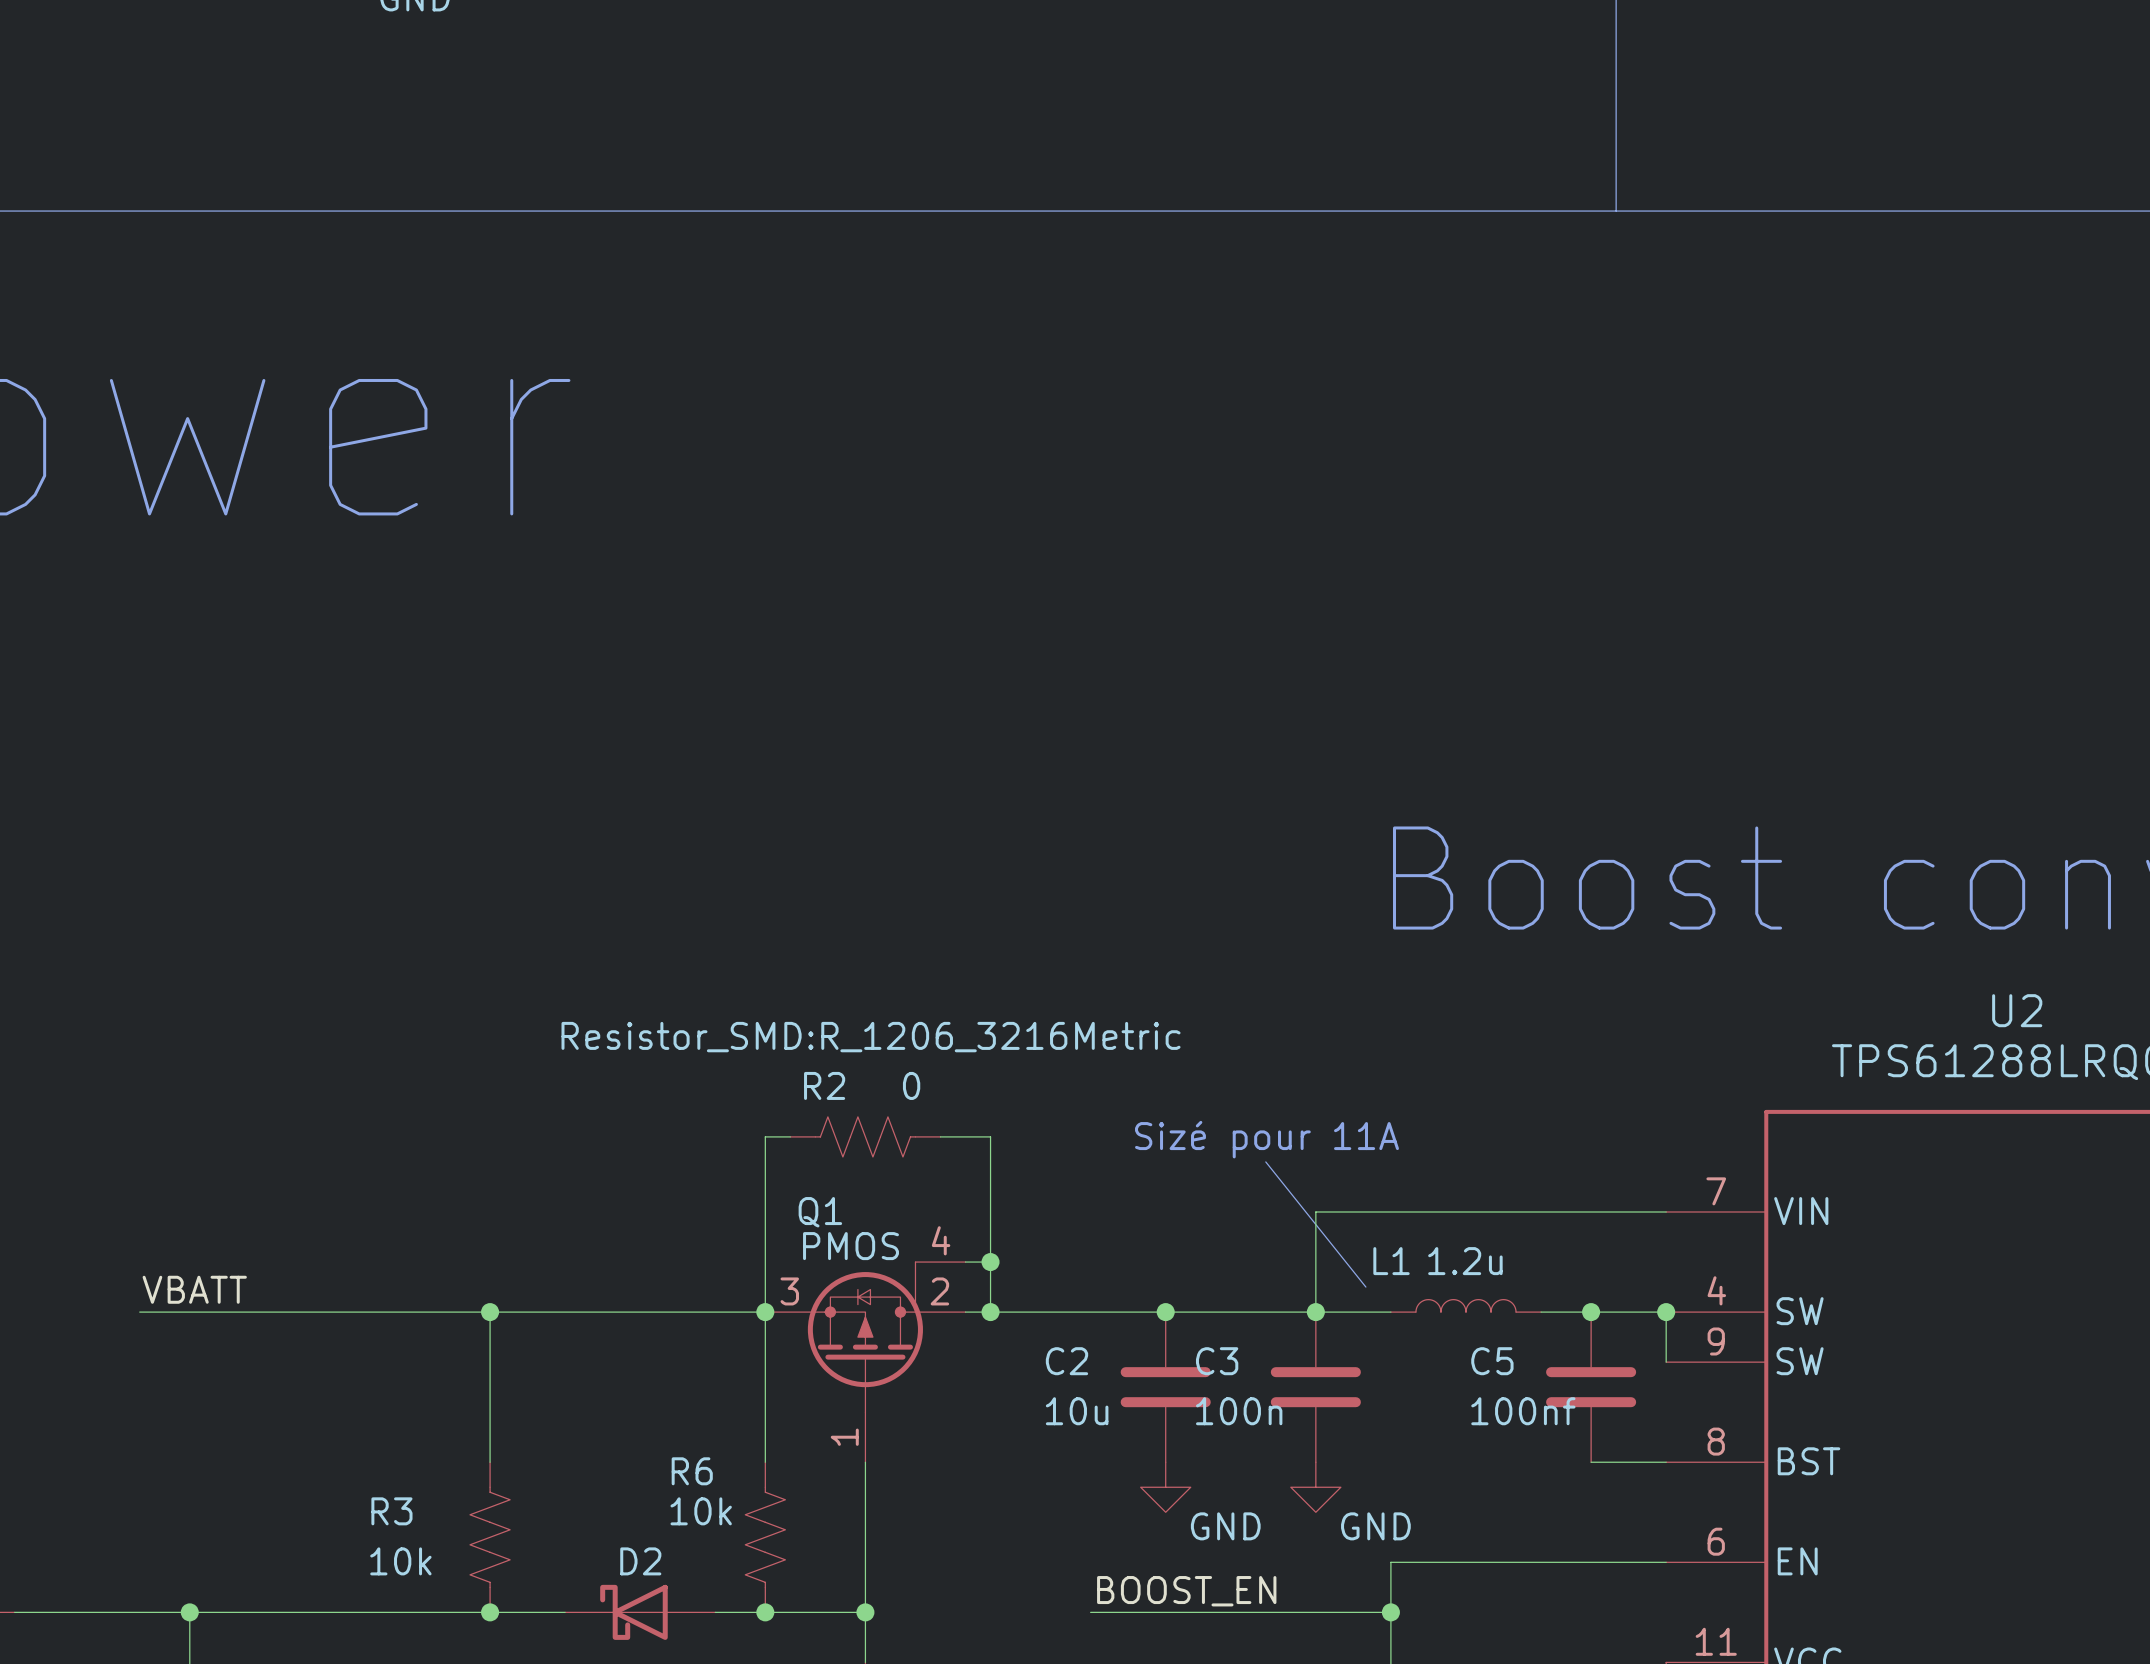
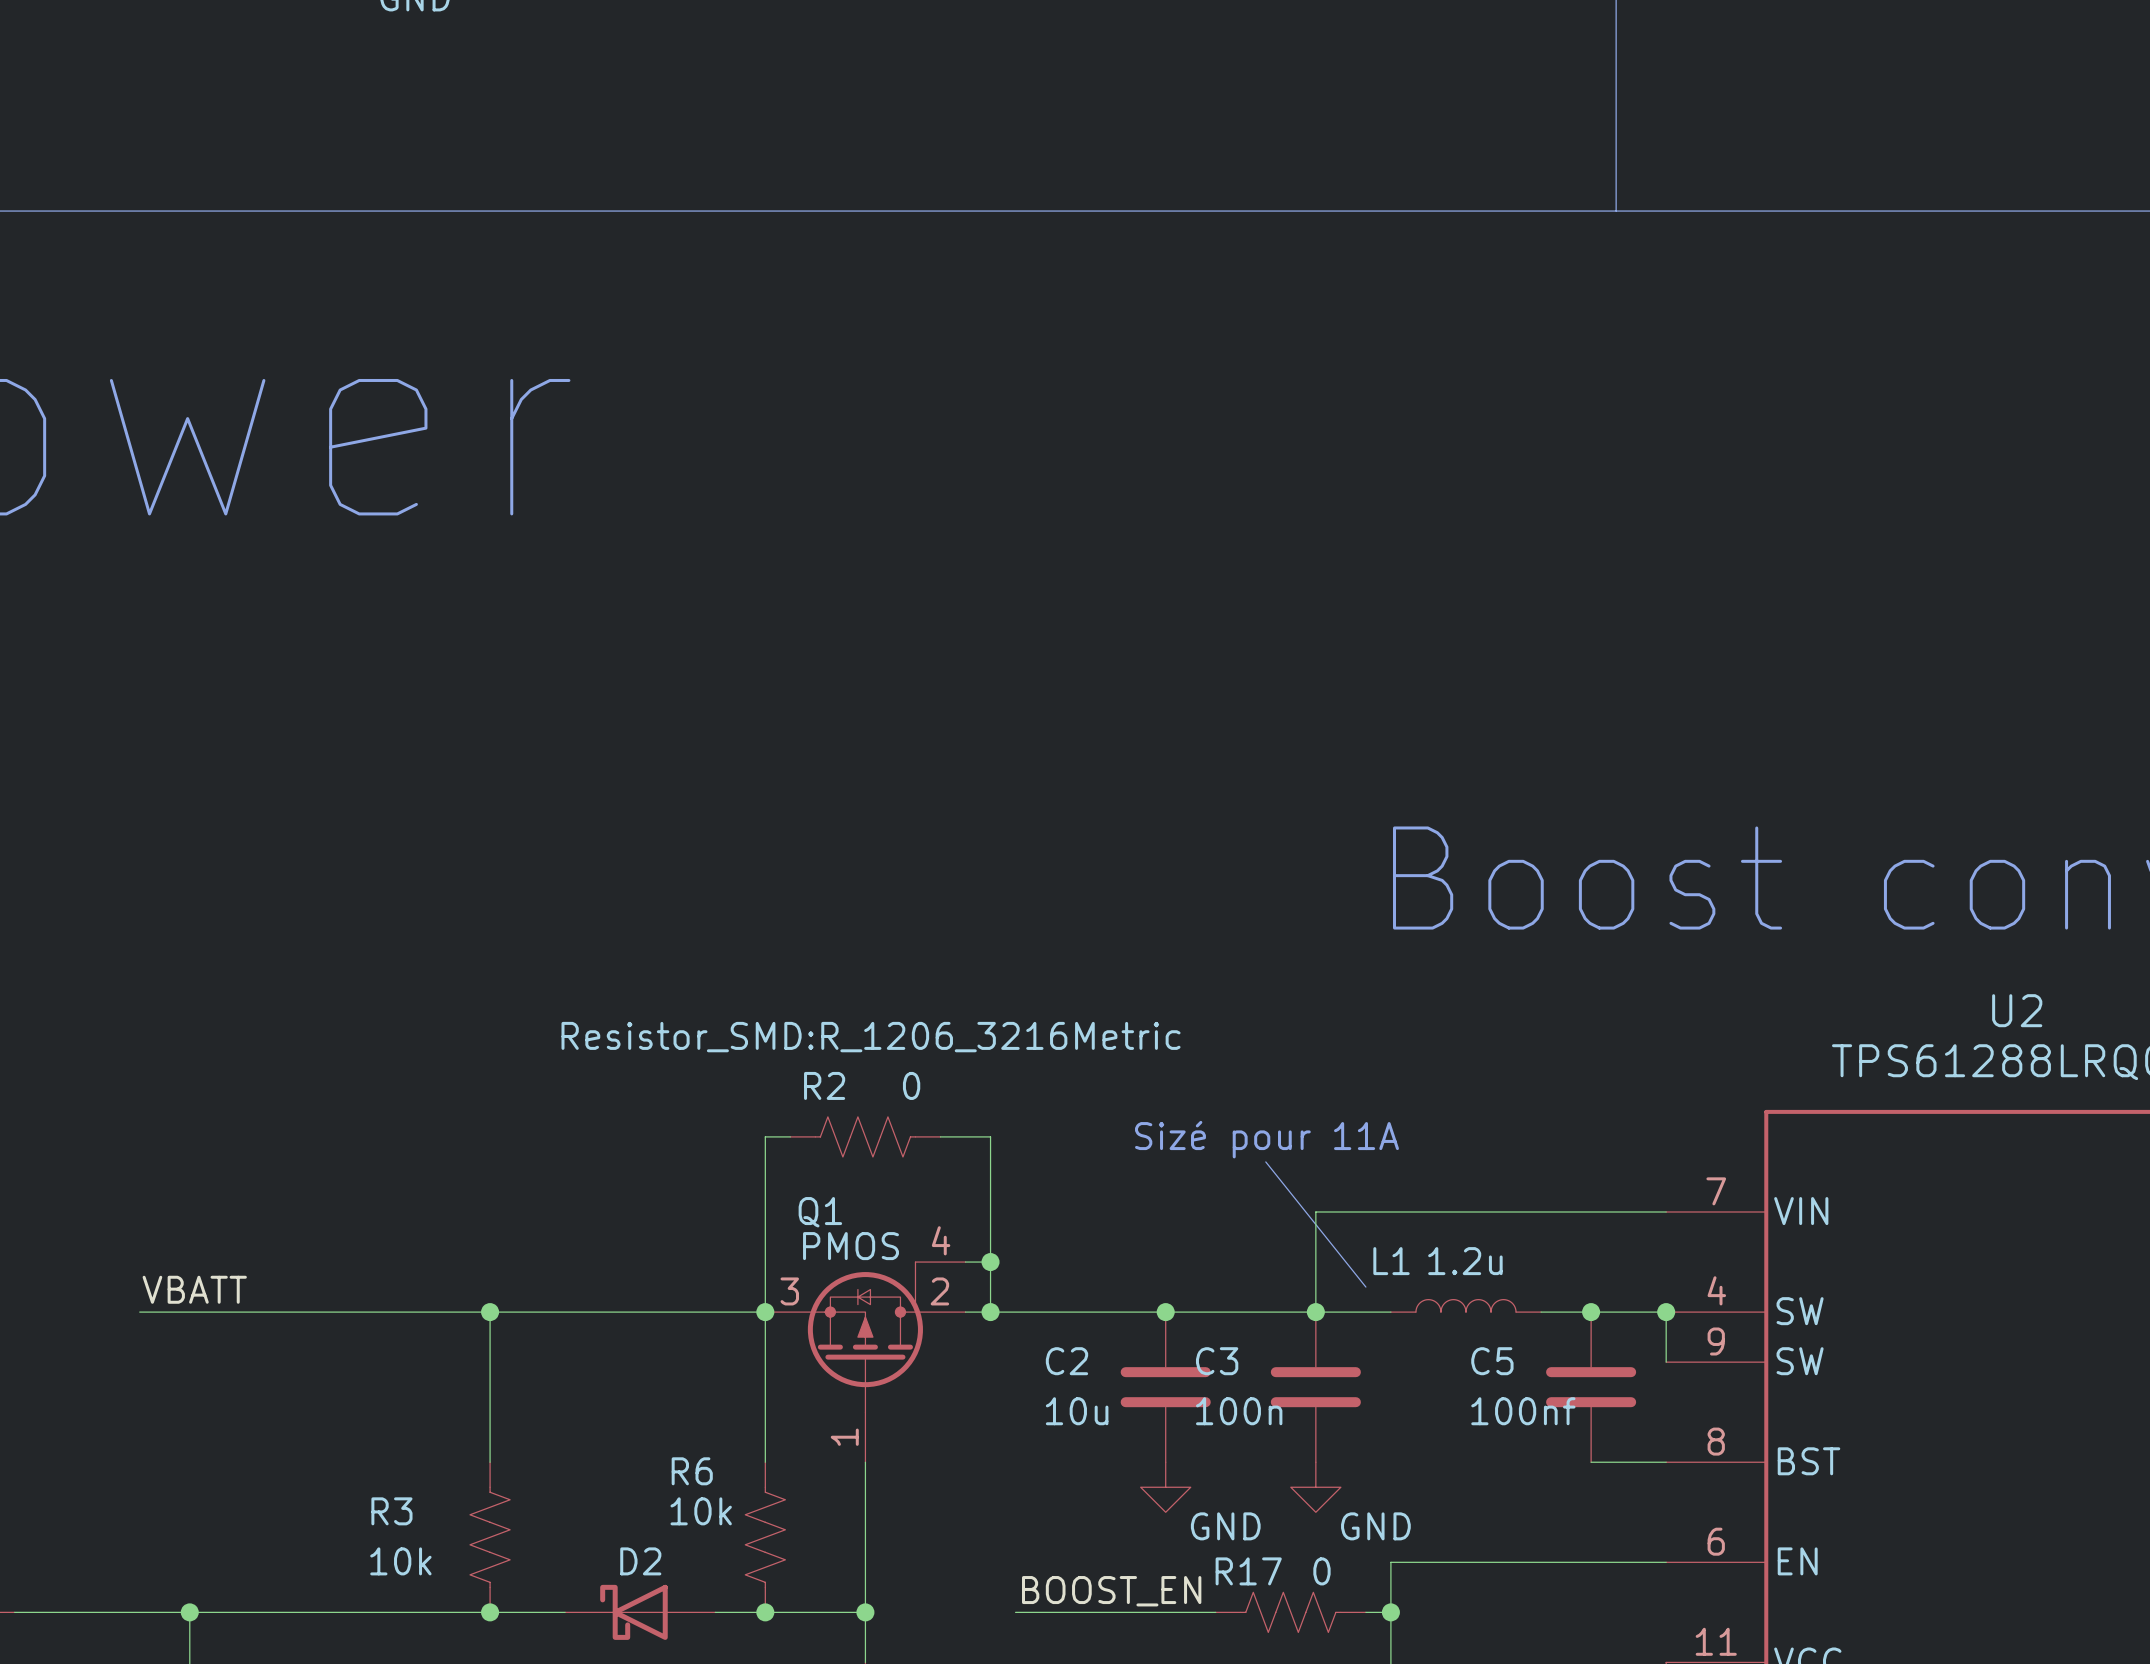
label position: BOOST_EN (1186, 1591) -> BOOST_EN (1111, 1591)
wire: none -> (1015, 1612) (1090, 1612)
wire: (1215, 1612) (1365, 1612) -> none
R17: none -> 0 (1290, 1612)

